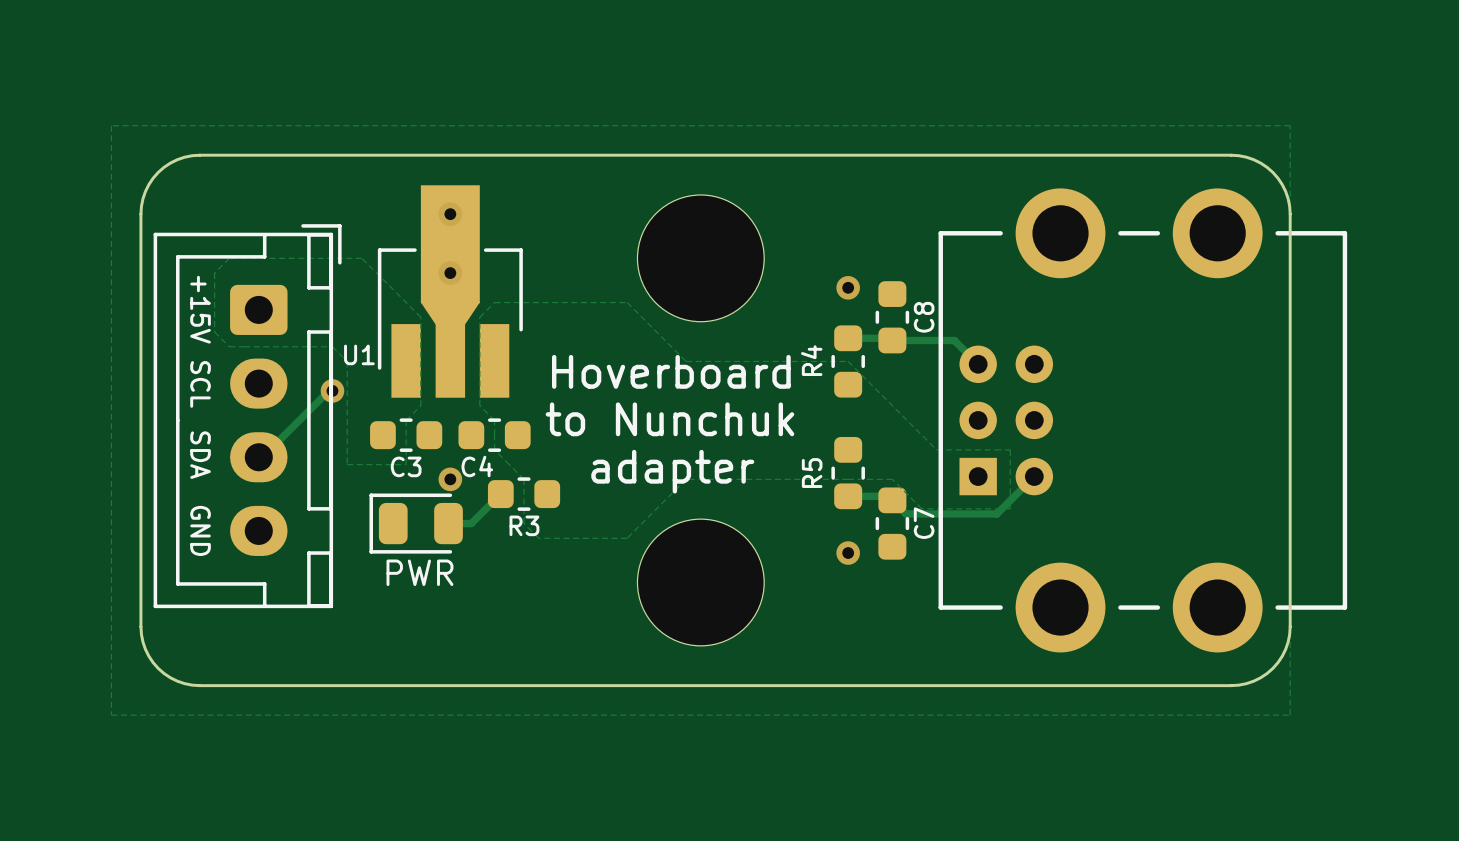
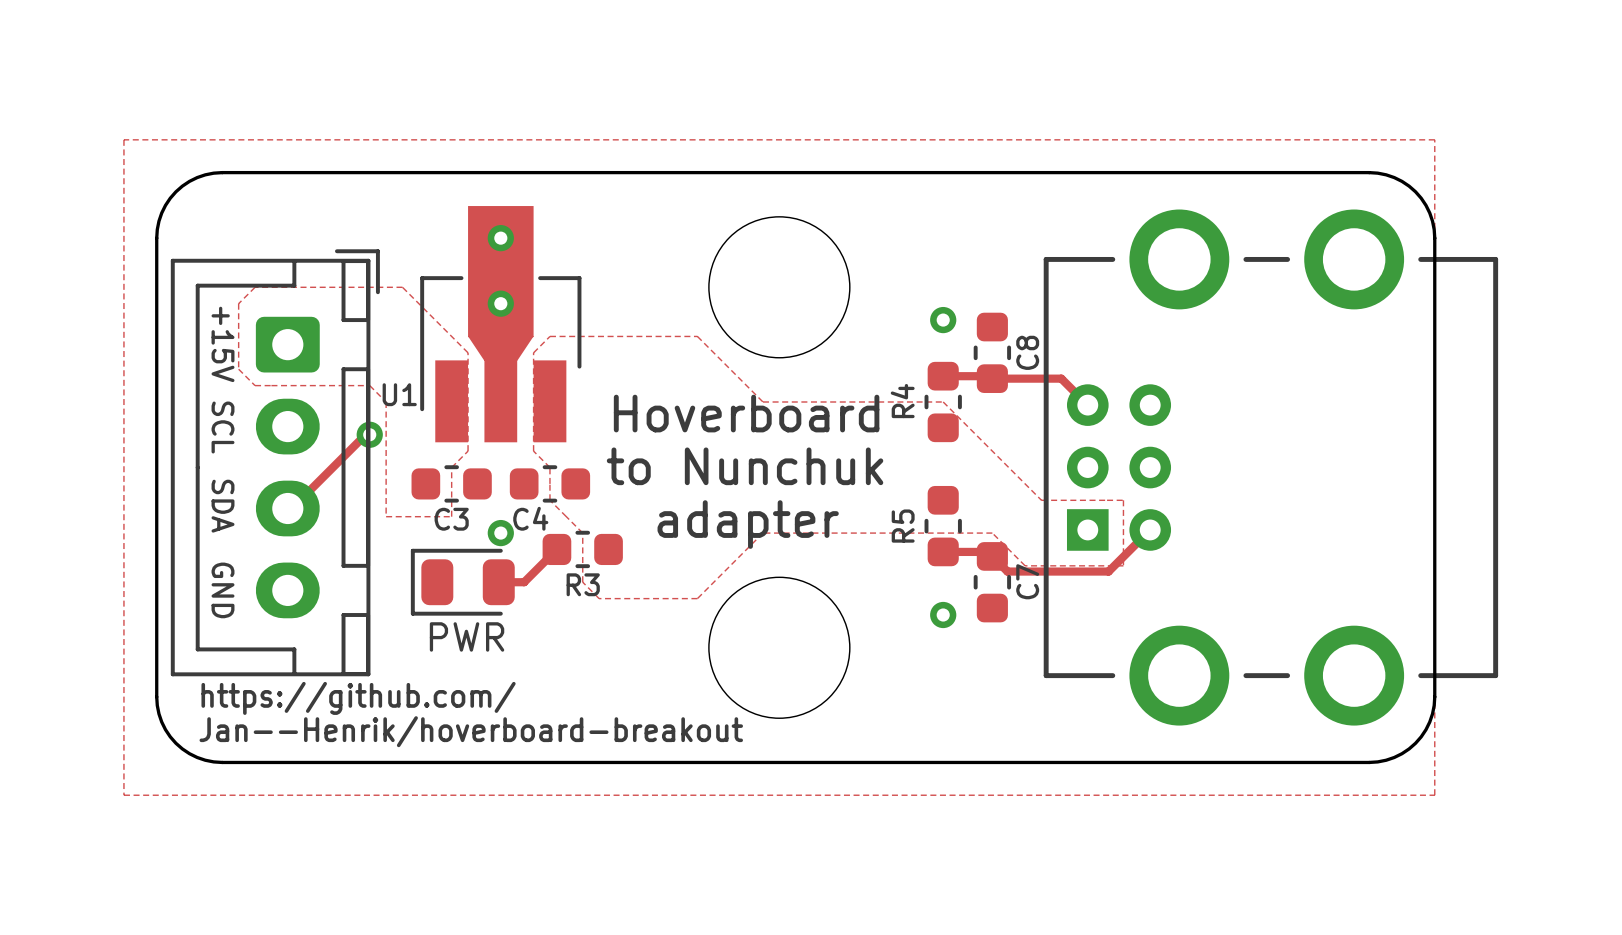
text: none -> https://github.com/ (358, 698)
text: none -> Jan--Henrik/hoverboard-breakout (471, 731)

